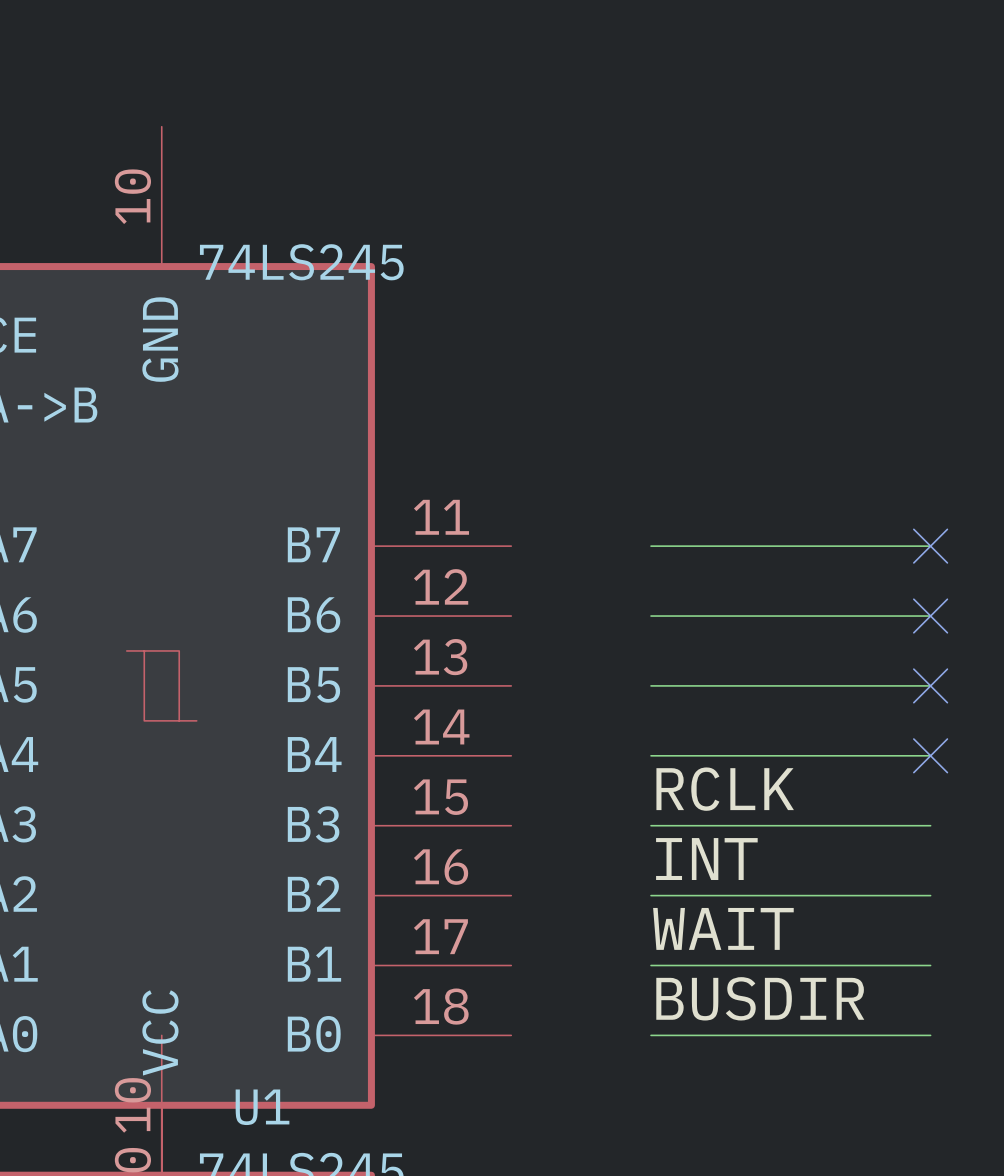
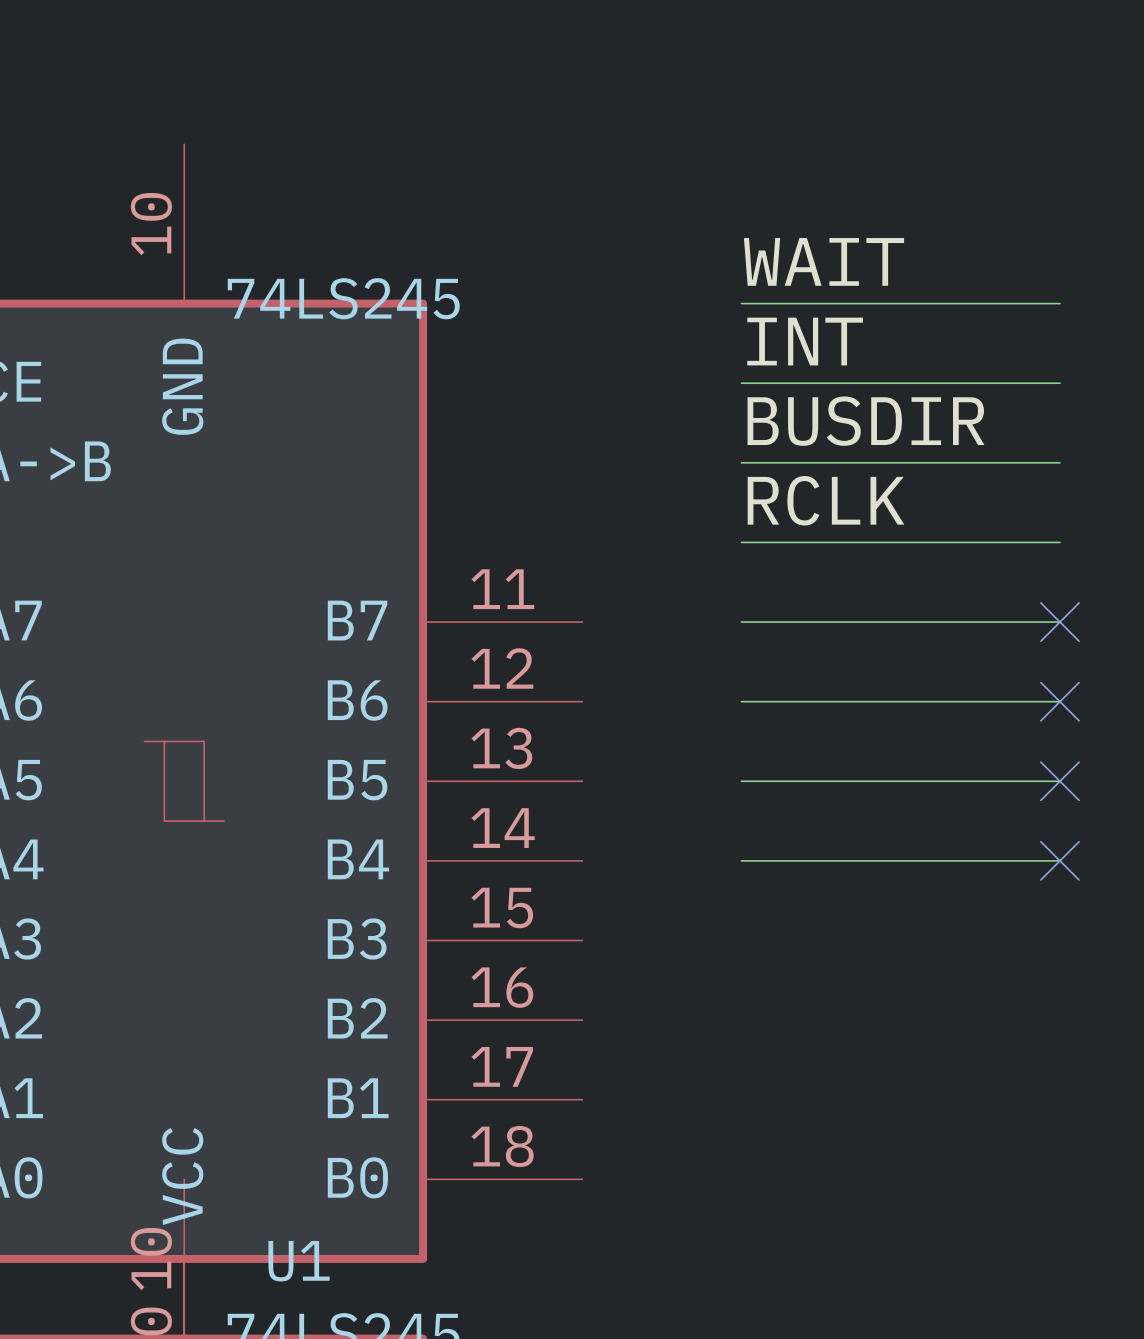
label: none -> WAIT (823, 261)
label position: RCLK (725, 789) -> RCLK (825, 500)
wire: (651, 825) (930, 825) -> (741, 303) (1059, 303)
label position: INT (706, 859) -> INT (805, 341)
wire: (651, 895) (930, 895) -> (741, 383) (1059, 383)
label: WAIT (723, 928) -> none
wire: (651, 965) (930, 965) -> (741, 462) (1059, 462)
label position: BUSDIR (760, 998) -> BUSDIR (865, 421)
wire: (651, 1035) (930, 1035) -> (741, 542) (1059, 542)

